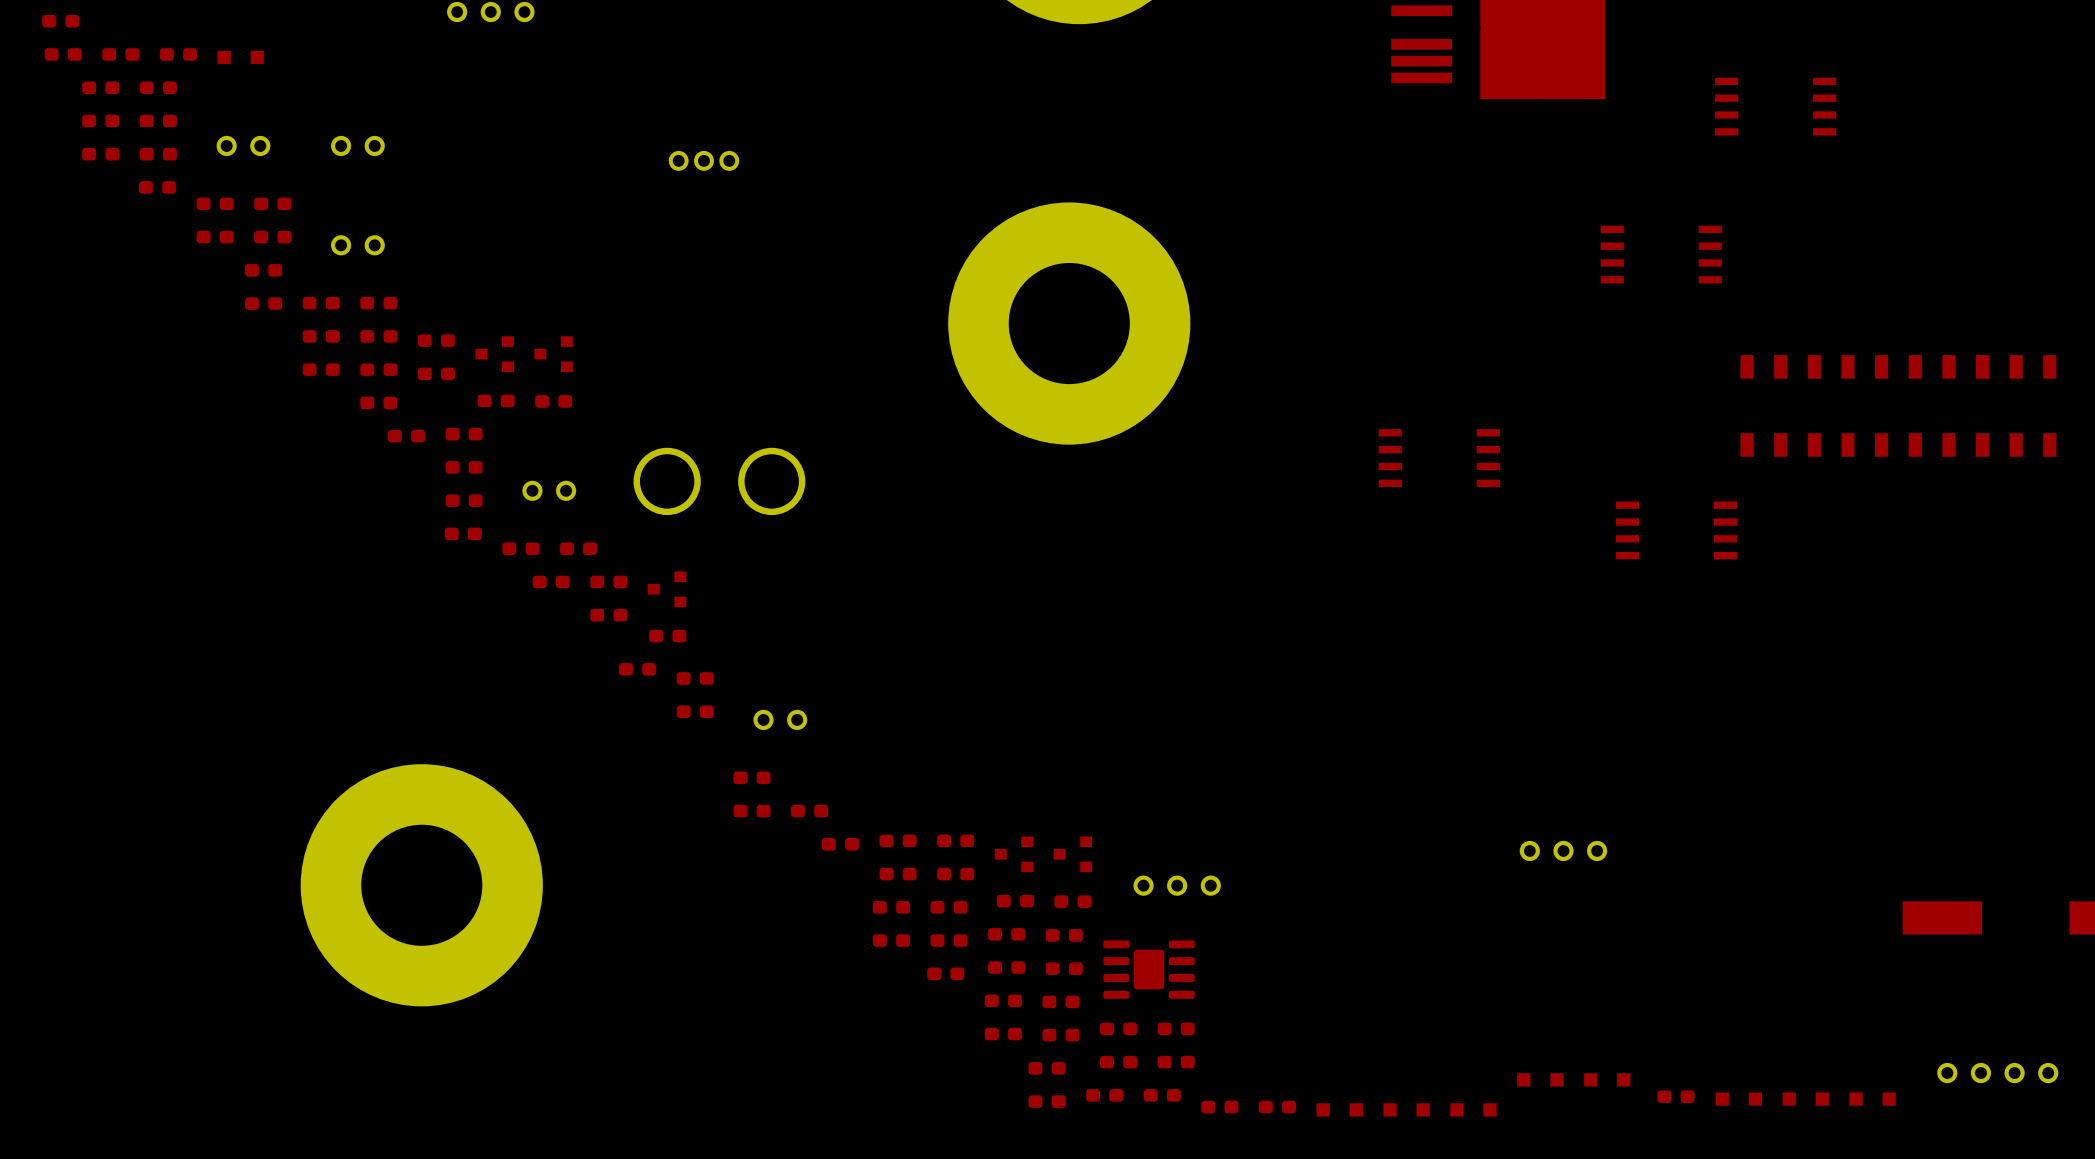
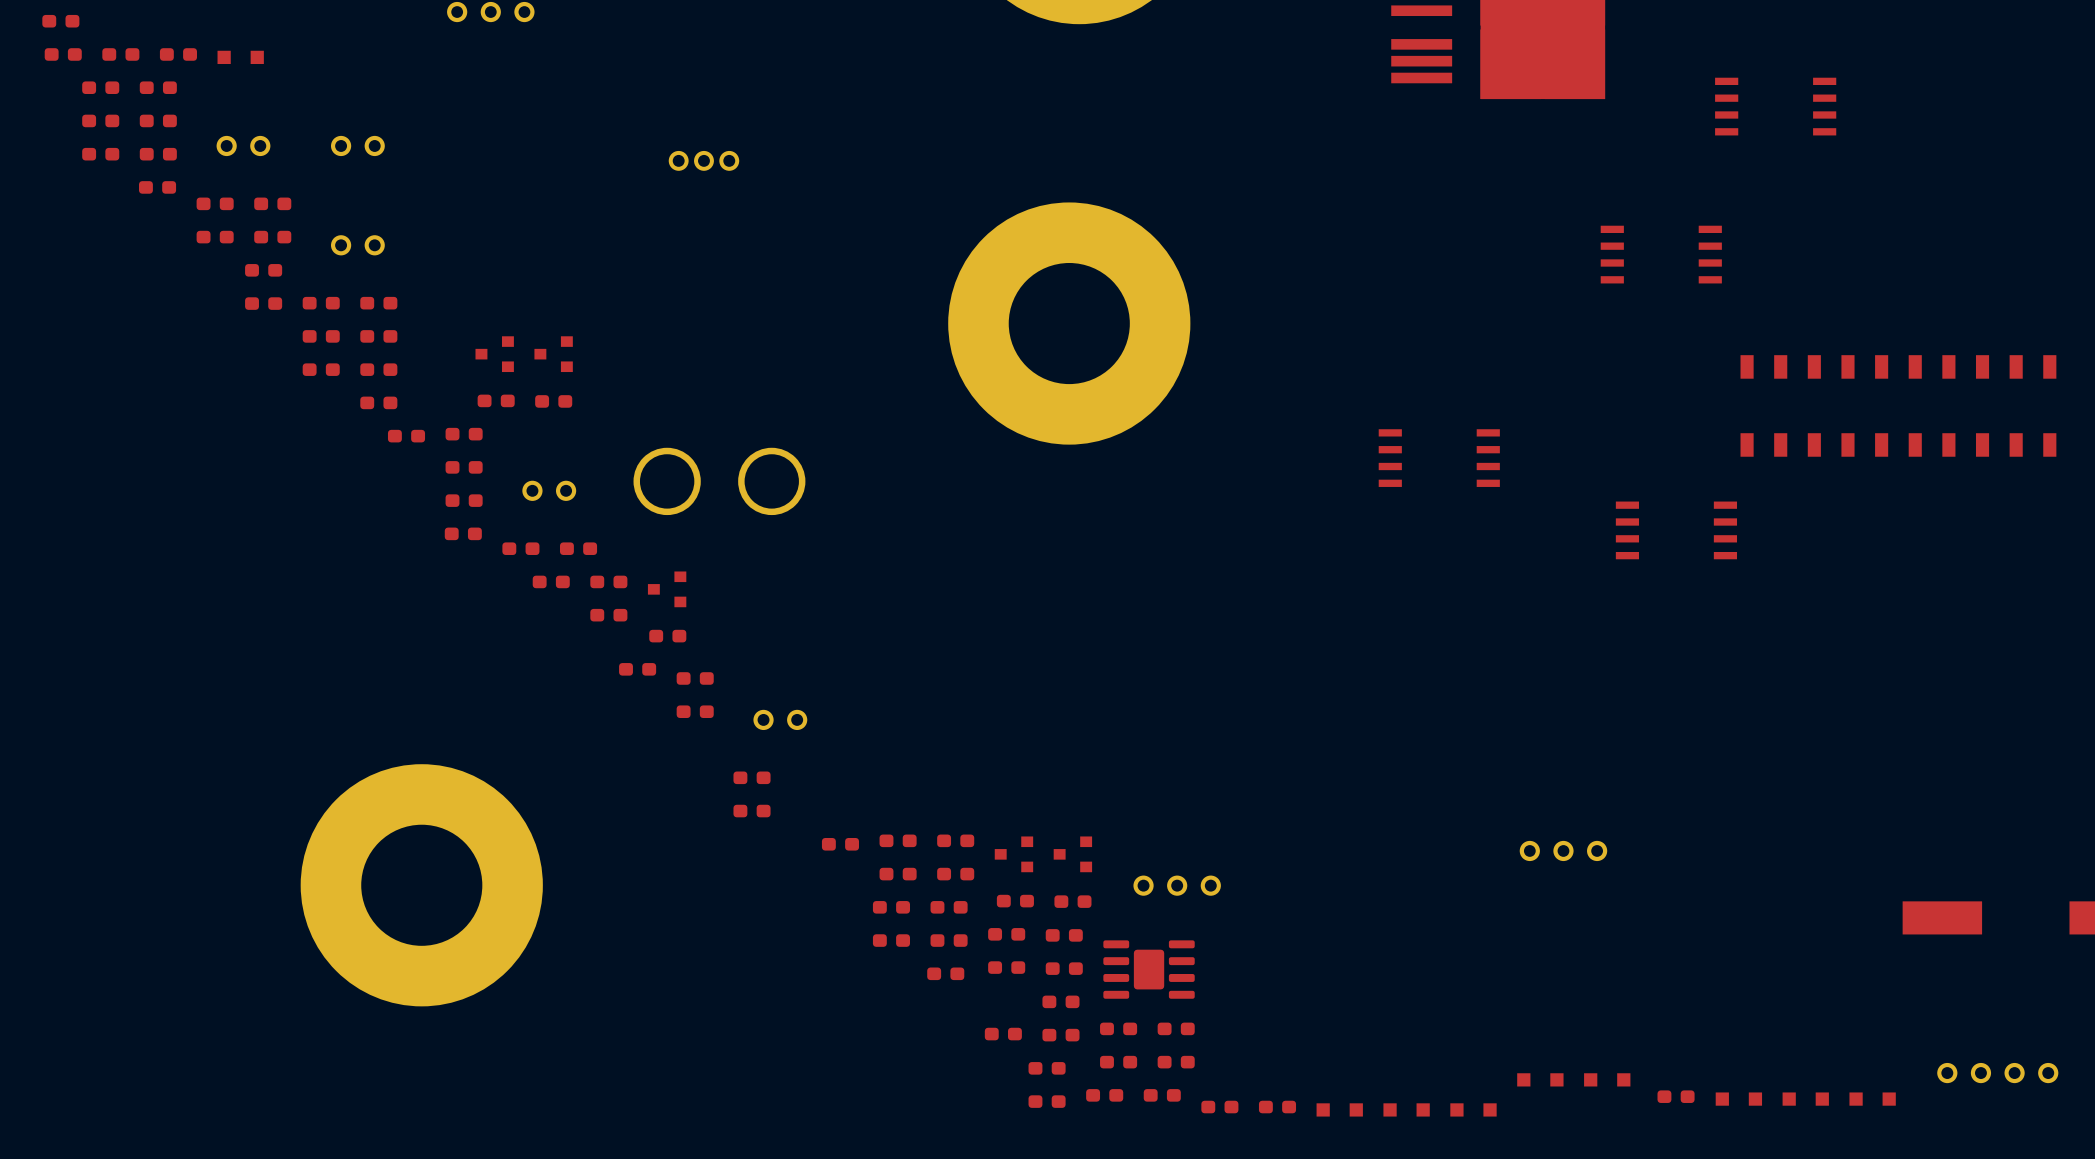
part: (436, 340) -> none
part: (436, 373) -> none
part: (809, 811) -> none
part: (1003, 1000) -> none

